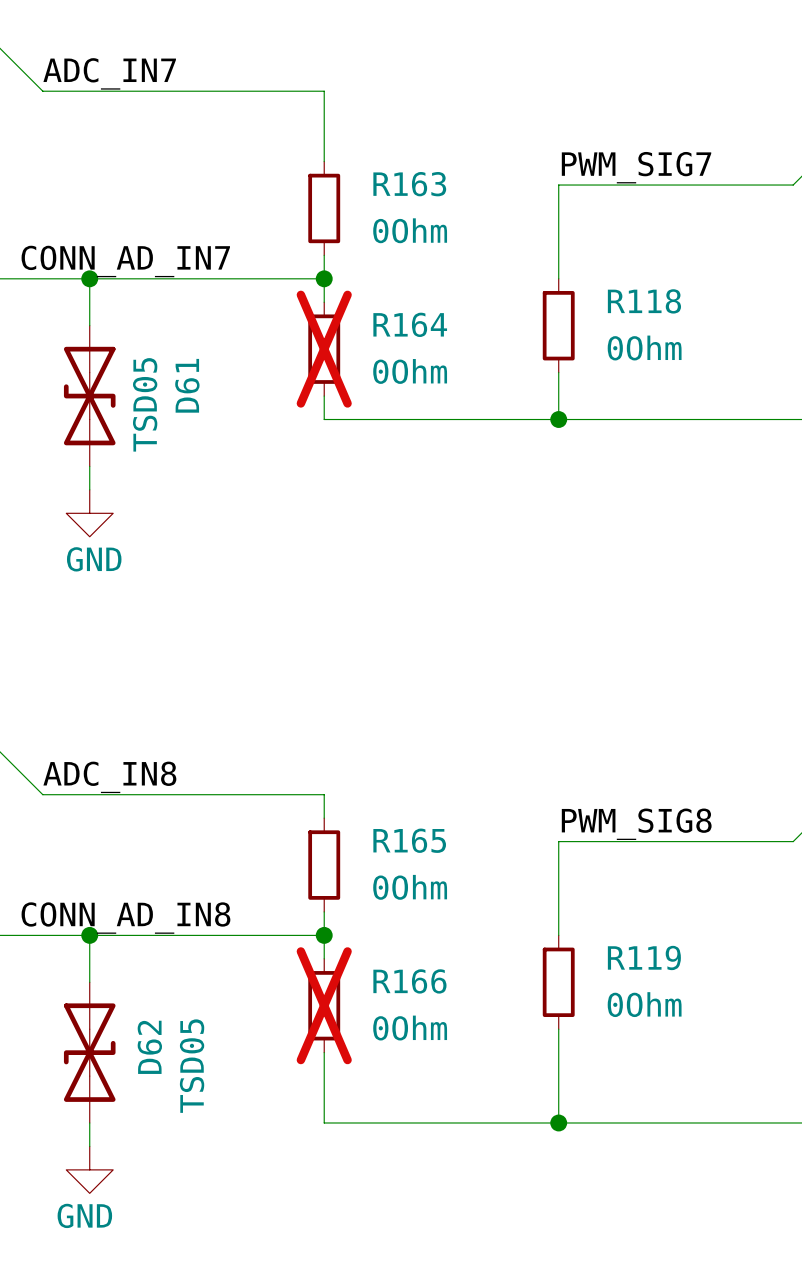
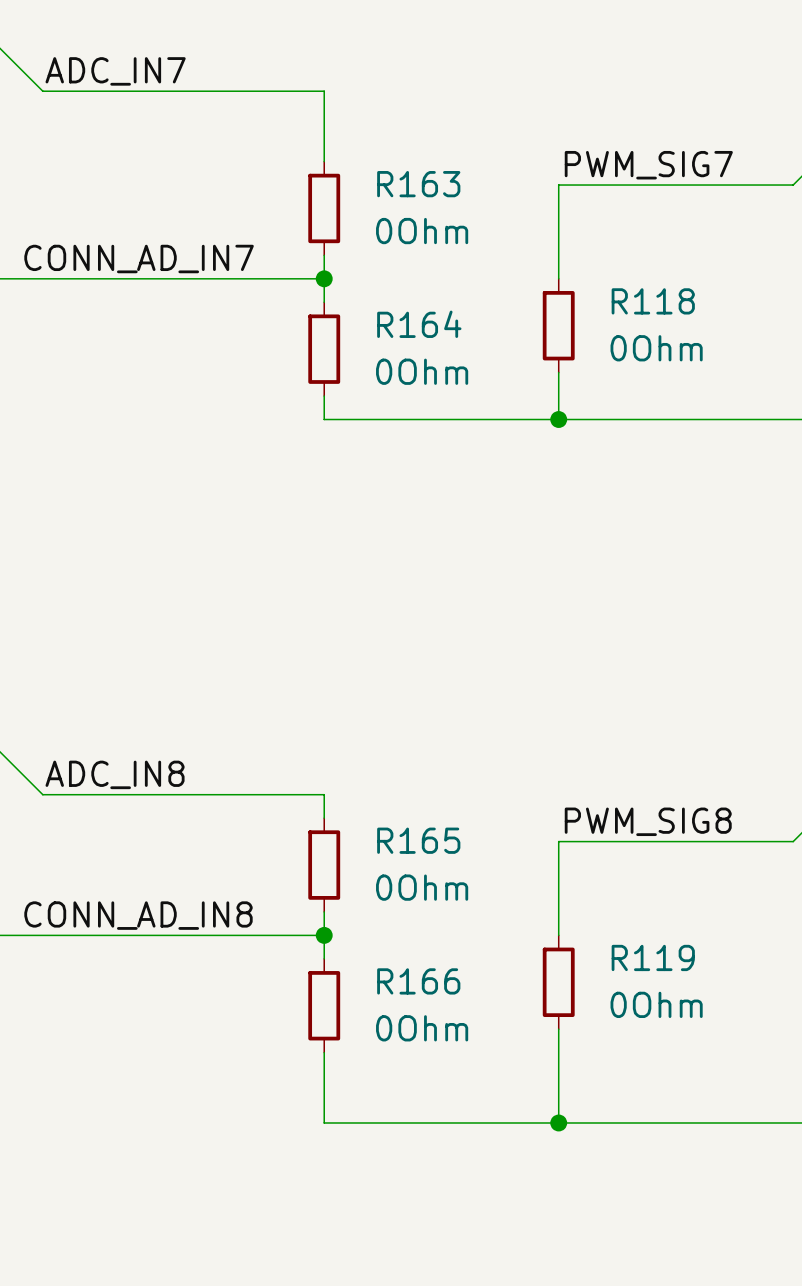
wire: (89, 278) (89, 325) -> none
junction: (89, 278) -> none
R164 do-not-place cross: (324, 349) -> none
D61: TSD05 (89, 396) -> none
wire: (89, 466) (89, 489) -> none
power symbol: GND (89, 513) -> none
wire: (89, 935) (89, 982) -> none
junction: (89, 935) -> none
R166 do-not-place cross: (324, 1005) -> none
D62: TSD05 (89, 1052) -> none
wire: (89, 1122) (89, 1146) -> none
power symbol: GND (89, 1169) -> none

